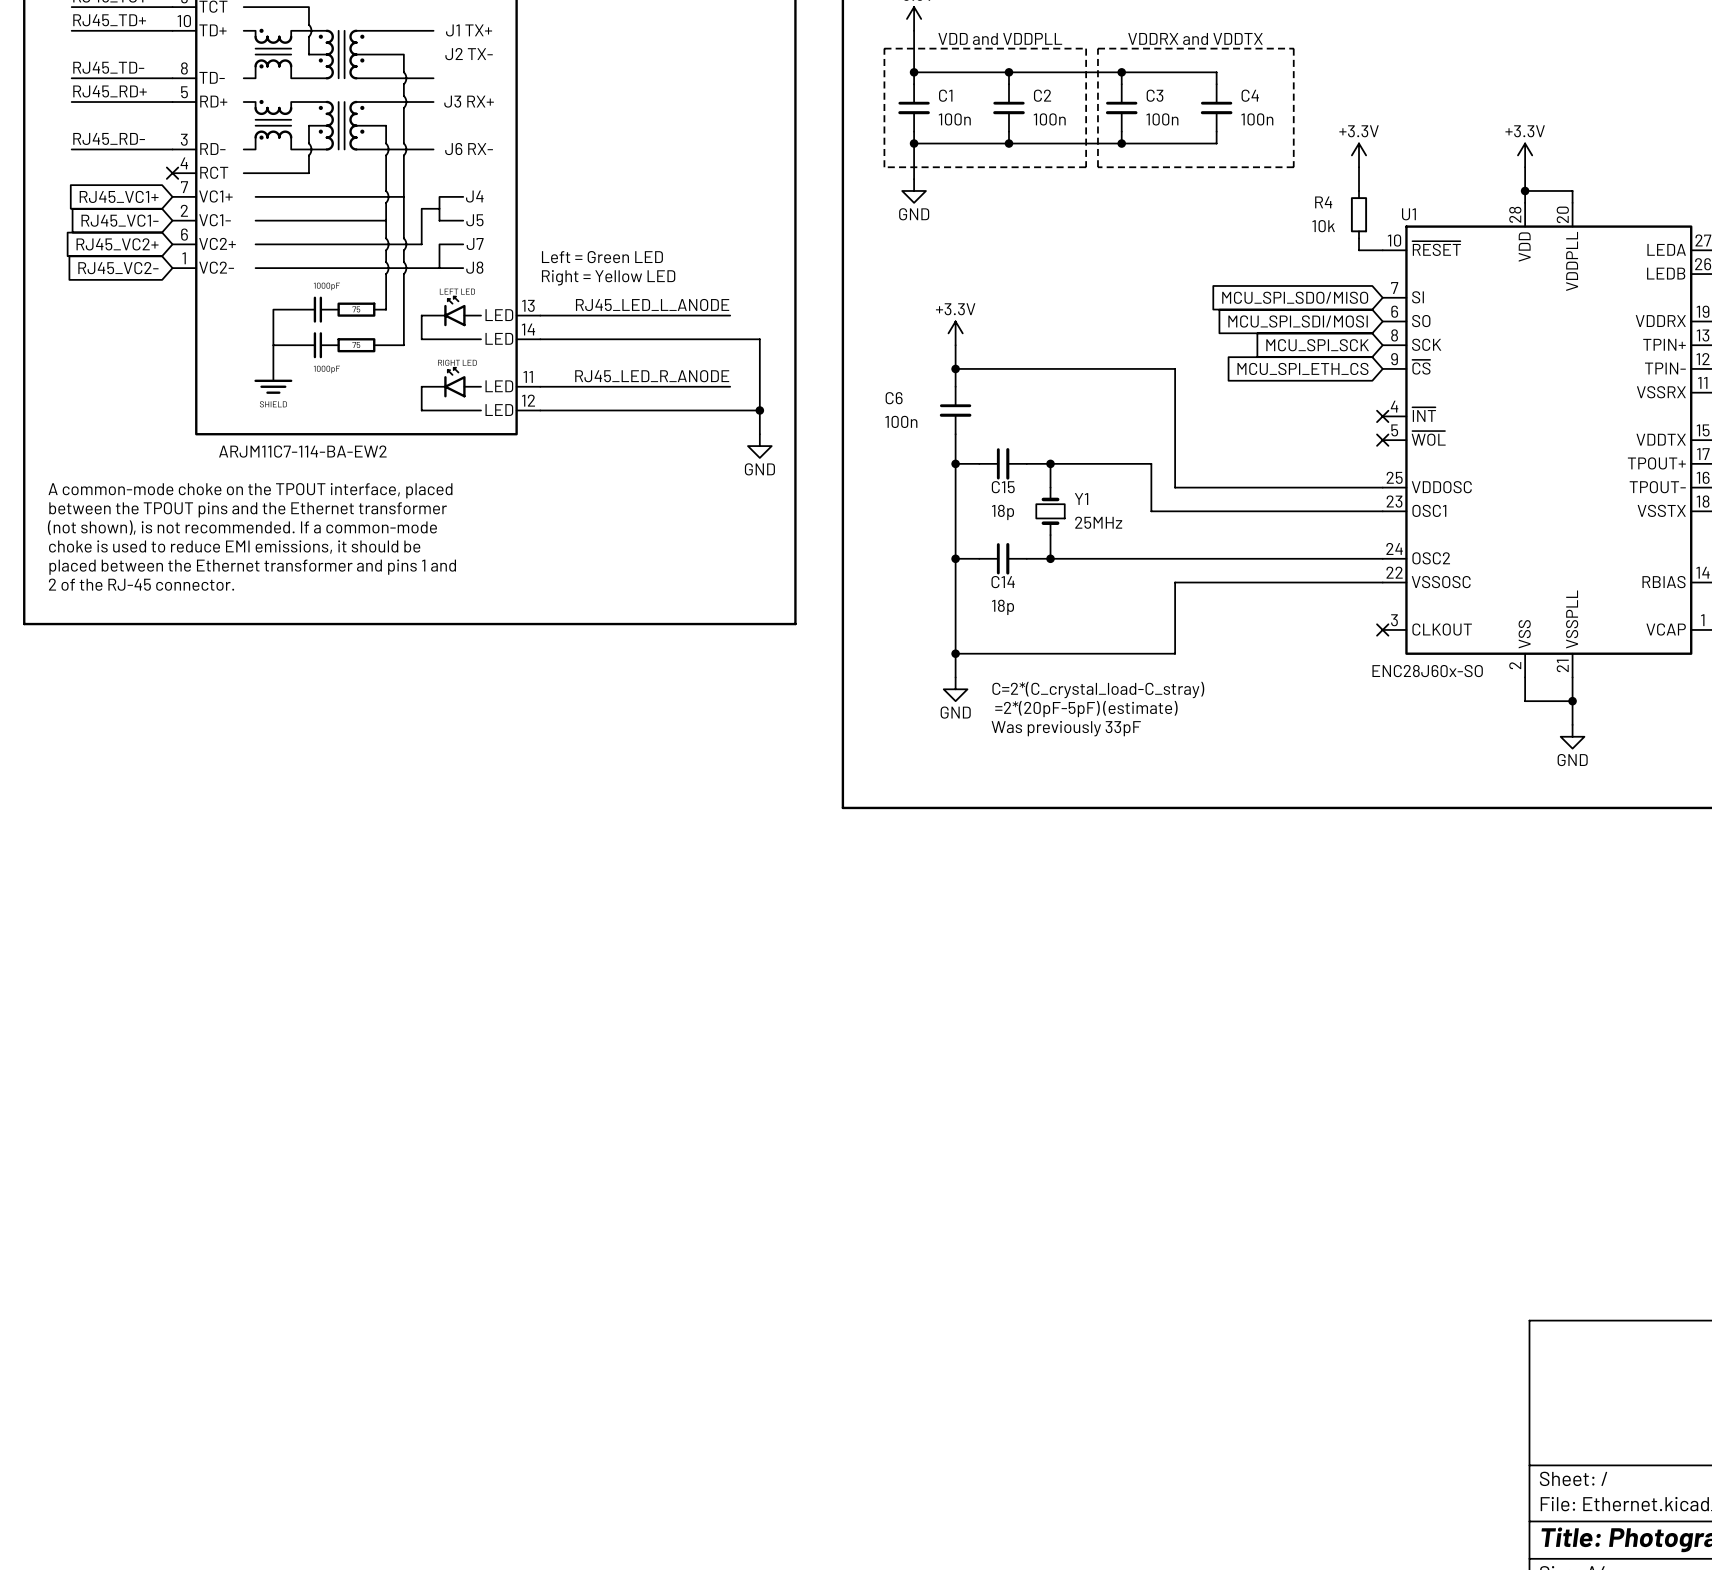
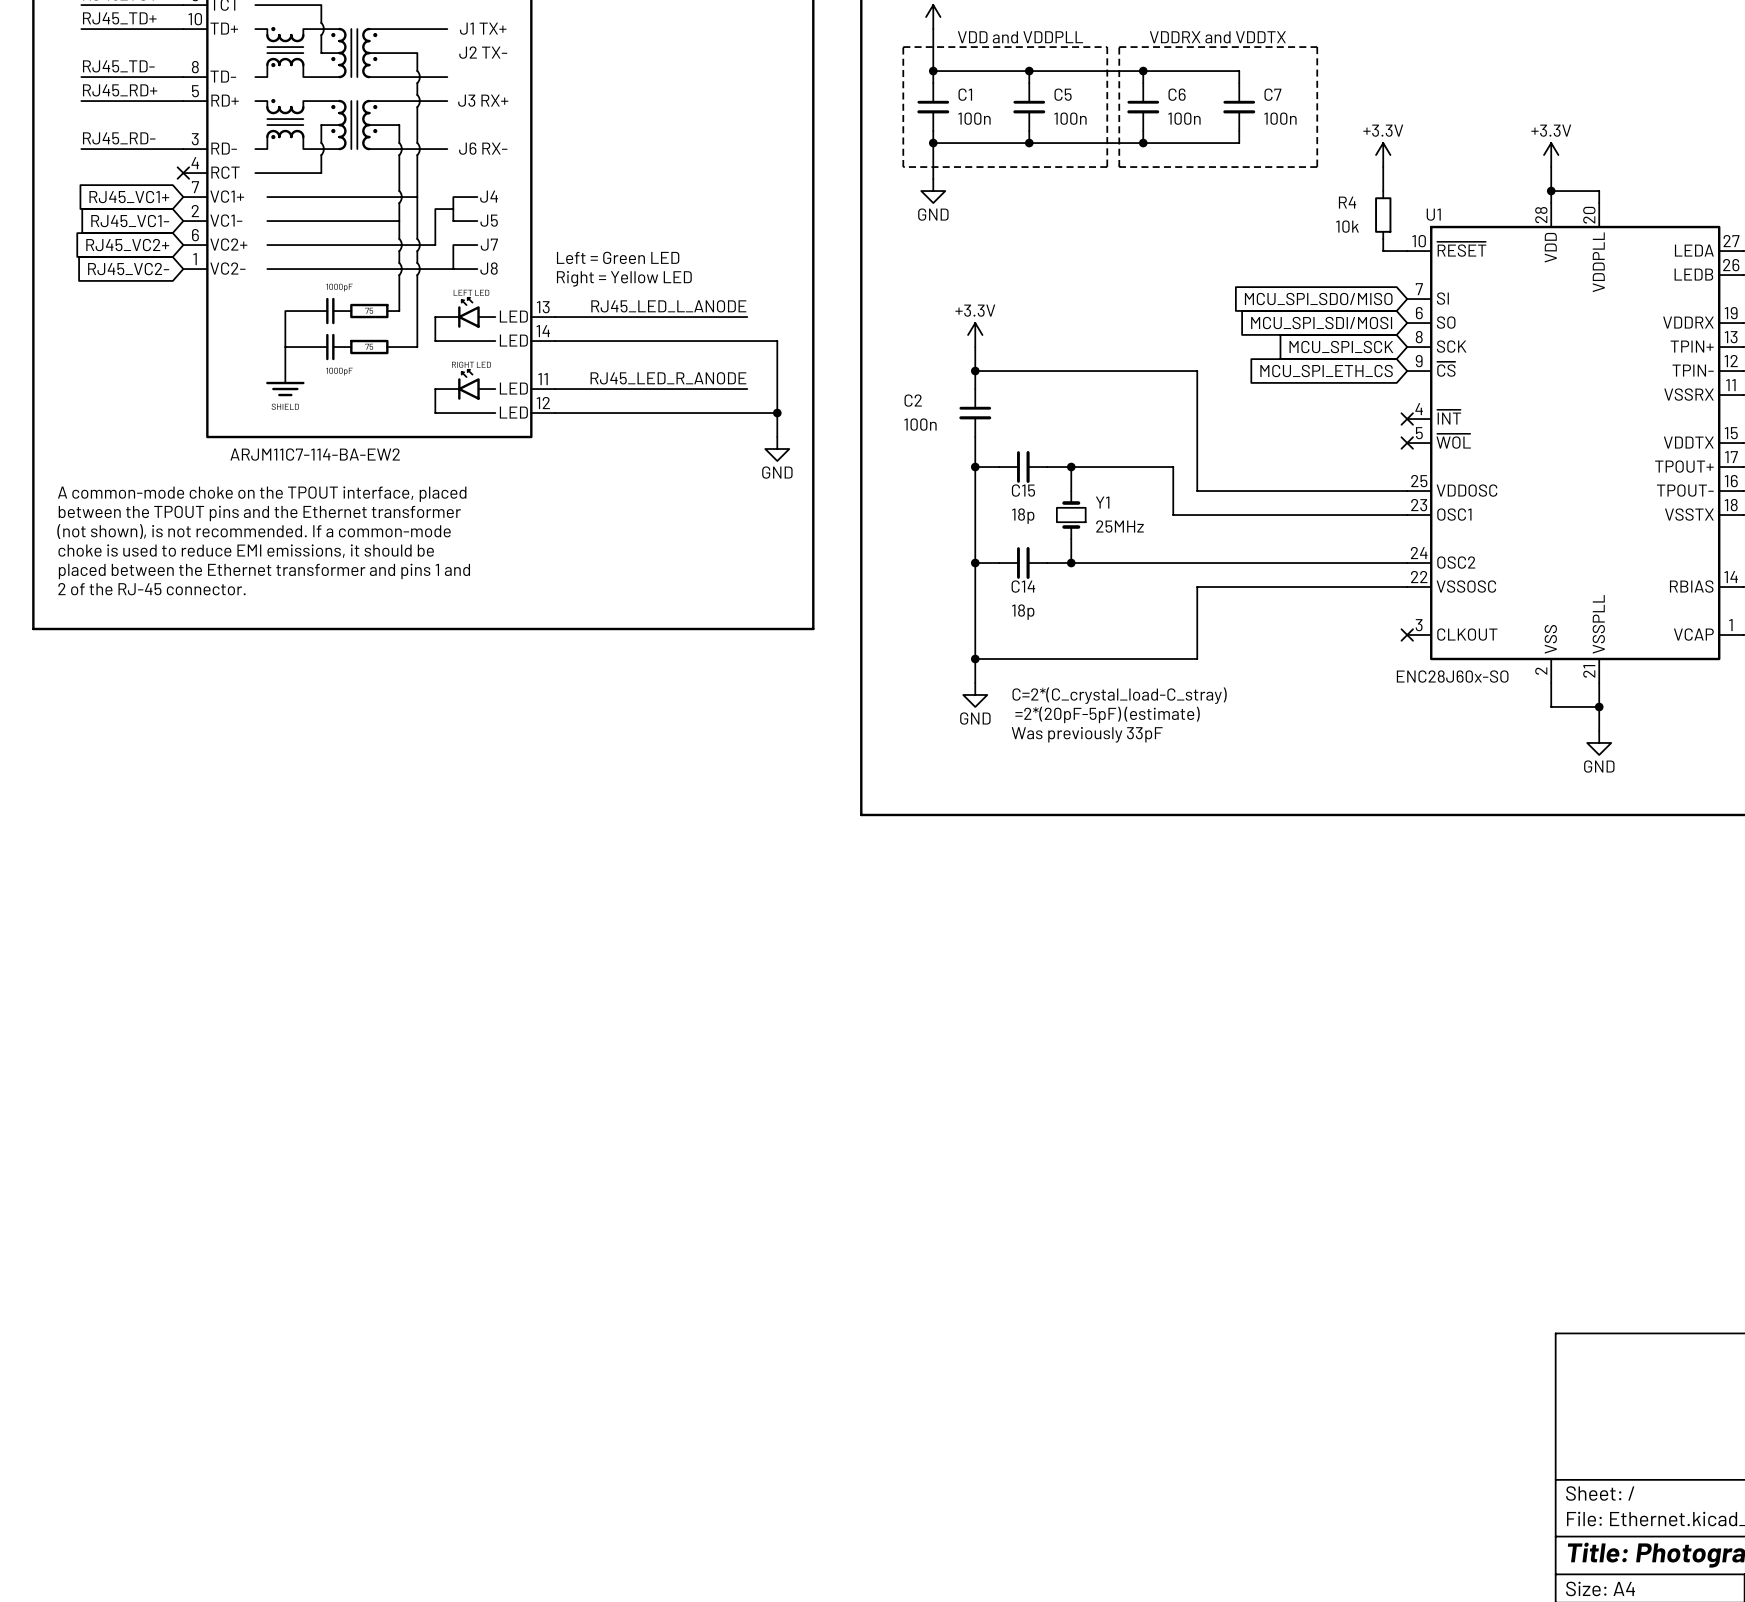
C2 name: C2 (1042, 95) -> C5 (1063, 94)
C3 name: C3 (1155, 95) -> C6 (1177, 94)
C4 name: C4 (1250, 95) -> C7 (1272, 94)
C6 name: C6 (894, 398) -> C2 (913, 400)

